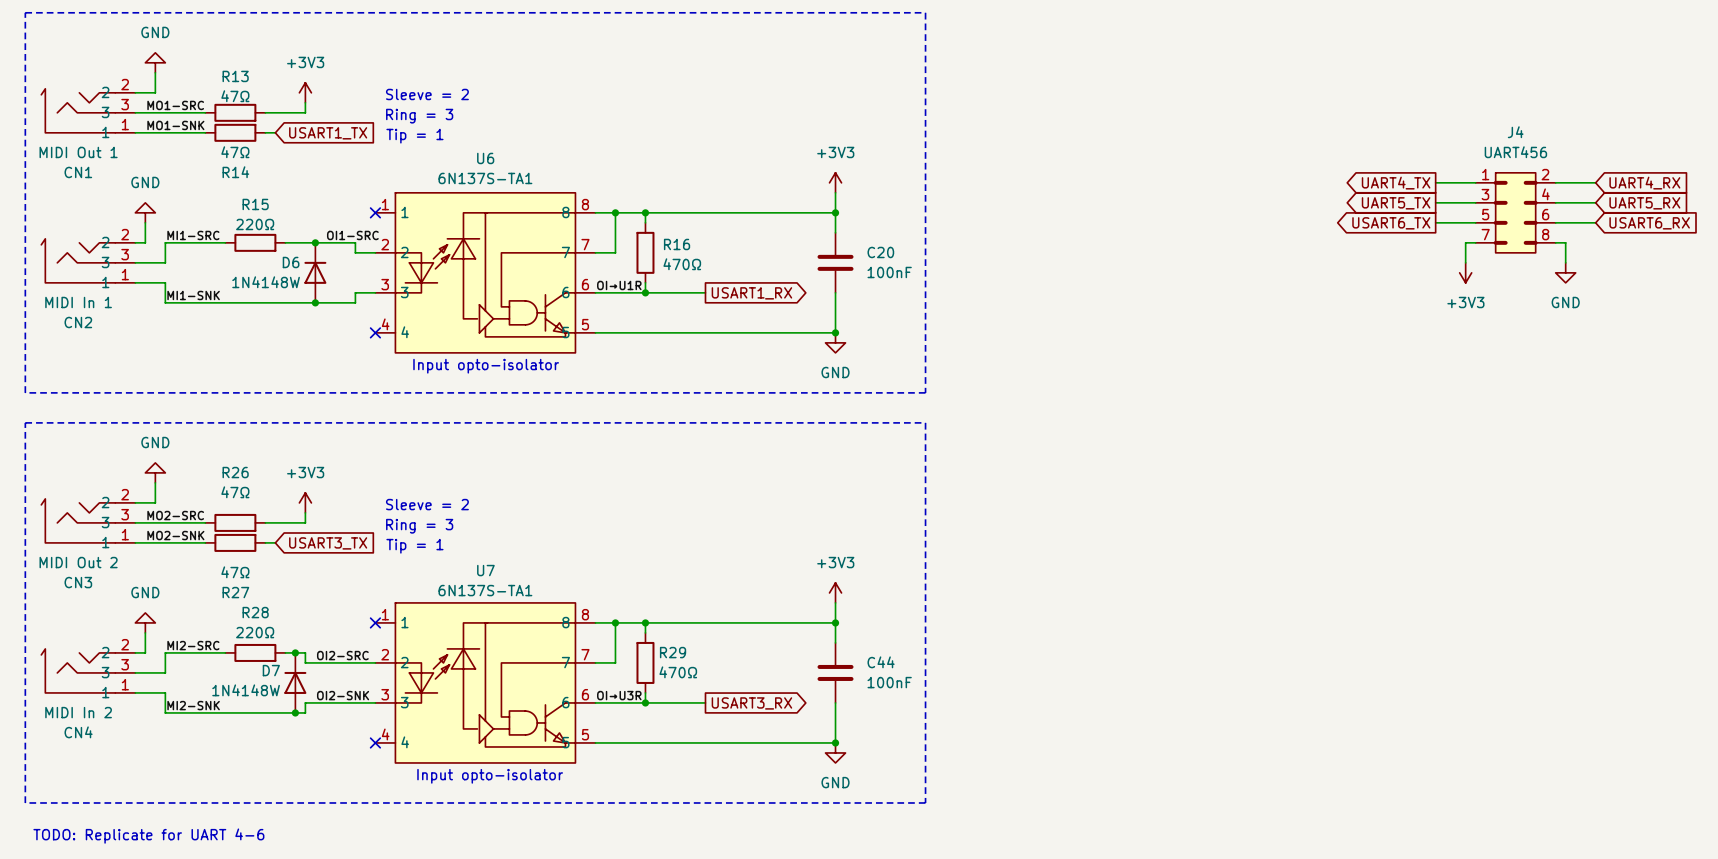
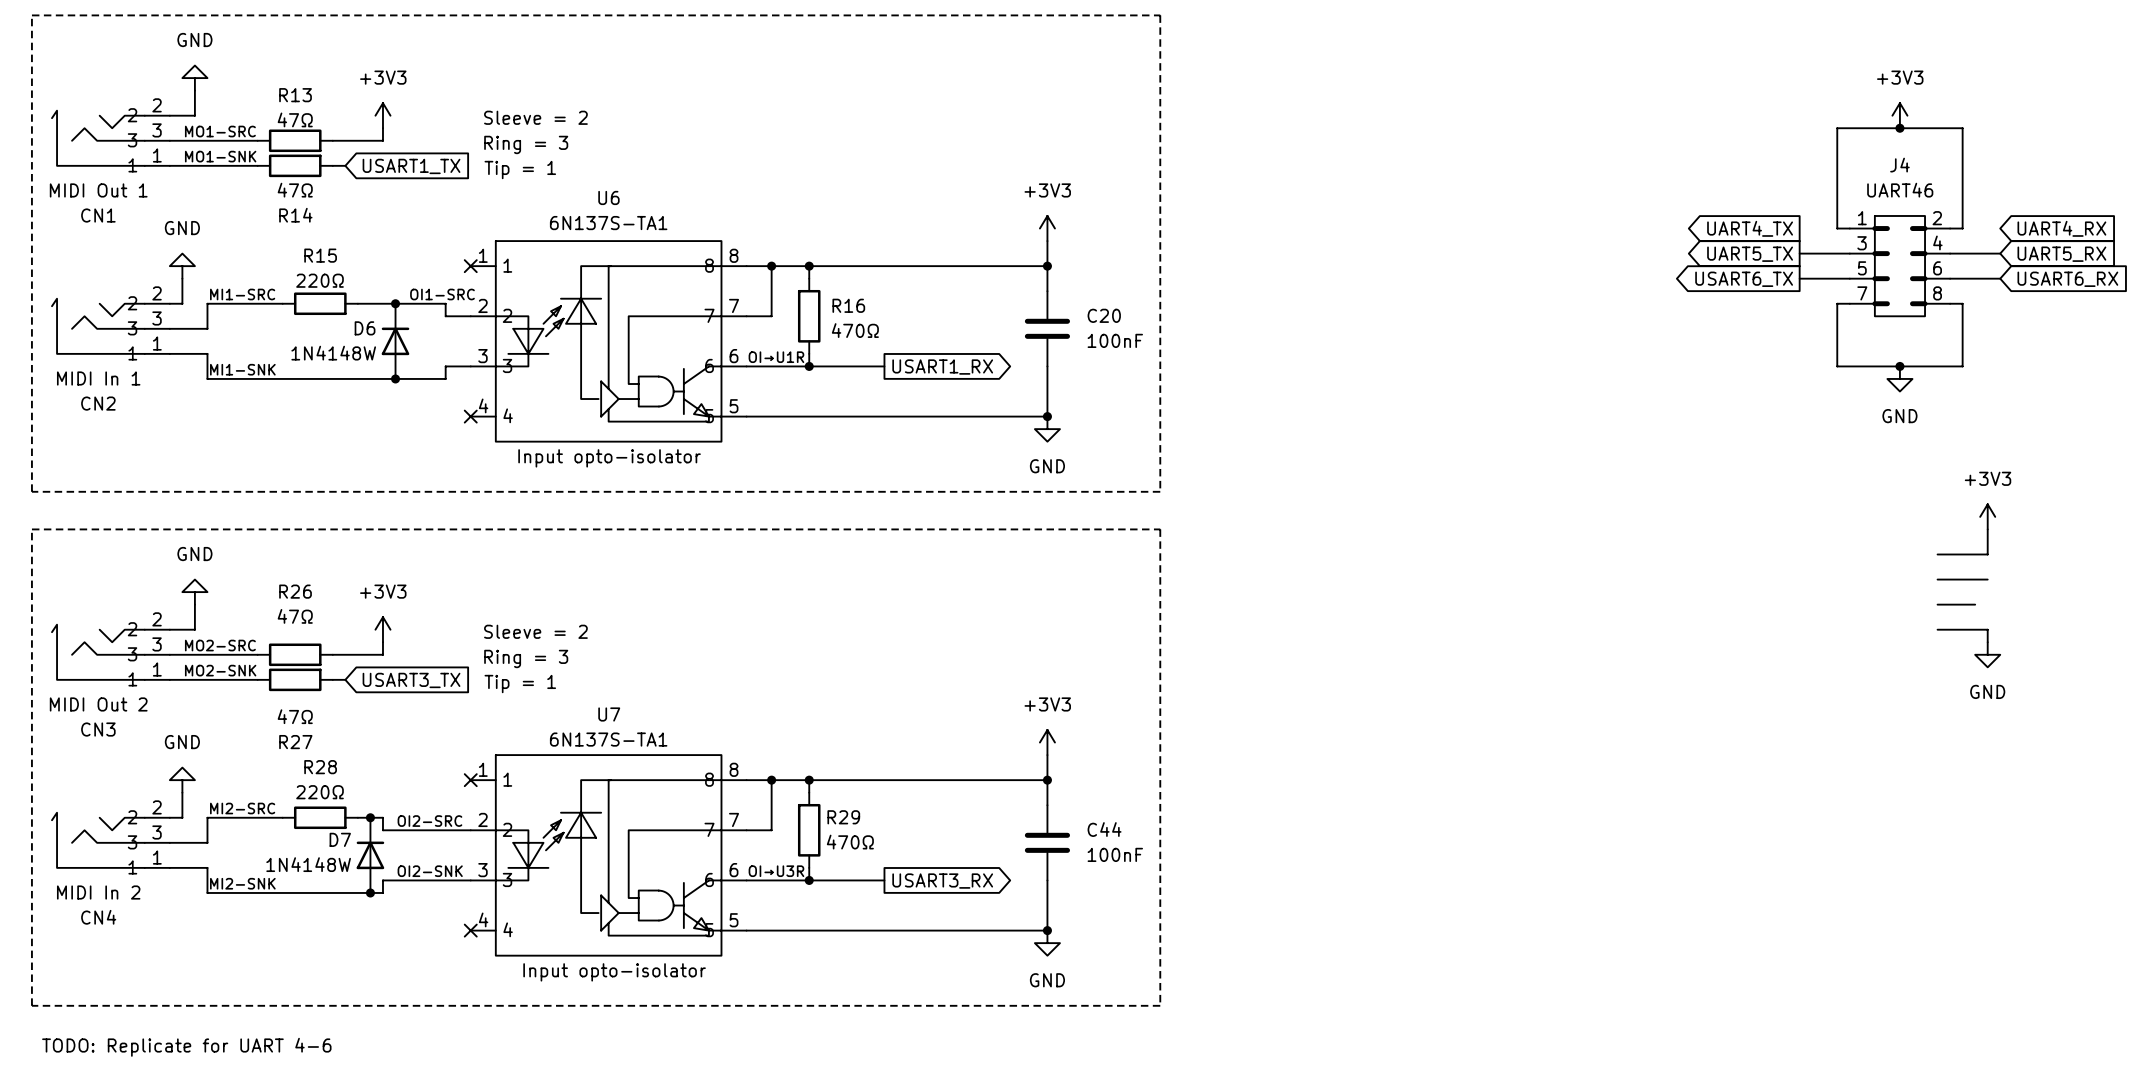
power symbol: none -> +3V3 (1899, 115)
junction: none -> (1899, 128)
J4 value: UART456 (1515, 152) -> UART46 (1900, 190)
wire: (1435, 182) (1465, 182) -> (1962, 228) (1962, 128) (1837, 128) (1837, 228)
wire: (1565, 182) (1595, 182) -> none
wire: none -> (1837, 328) (1837, 366) (1962, 366) (1962, 328)
power symbol: +3V3 (1465, 272) -> none
power symbol position: GND (1565, 272) -> GND (1899, 378)
junction: none -> (1899, 366)
power symbol: none -> +3V3 (1987, 516)
wire: none -> (1987, 529) (1987, 554) (1937, 554)
wire: none -> (1937, 579) (1987, 579)
wire: none -> (1937, 604) (1975, 604)
wire: none -> (1937, 629) (1987, 629) (1987, 642)
power symbol: none -> GND (1987, 654)

